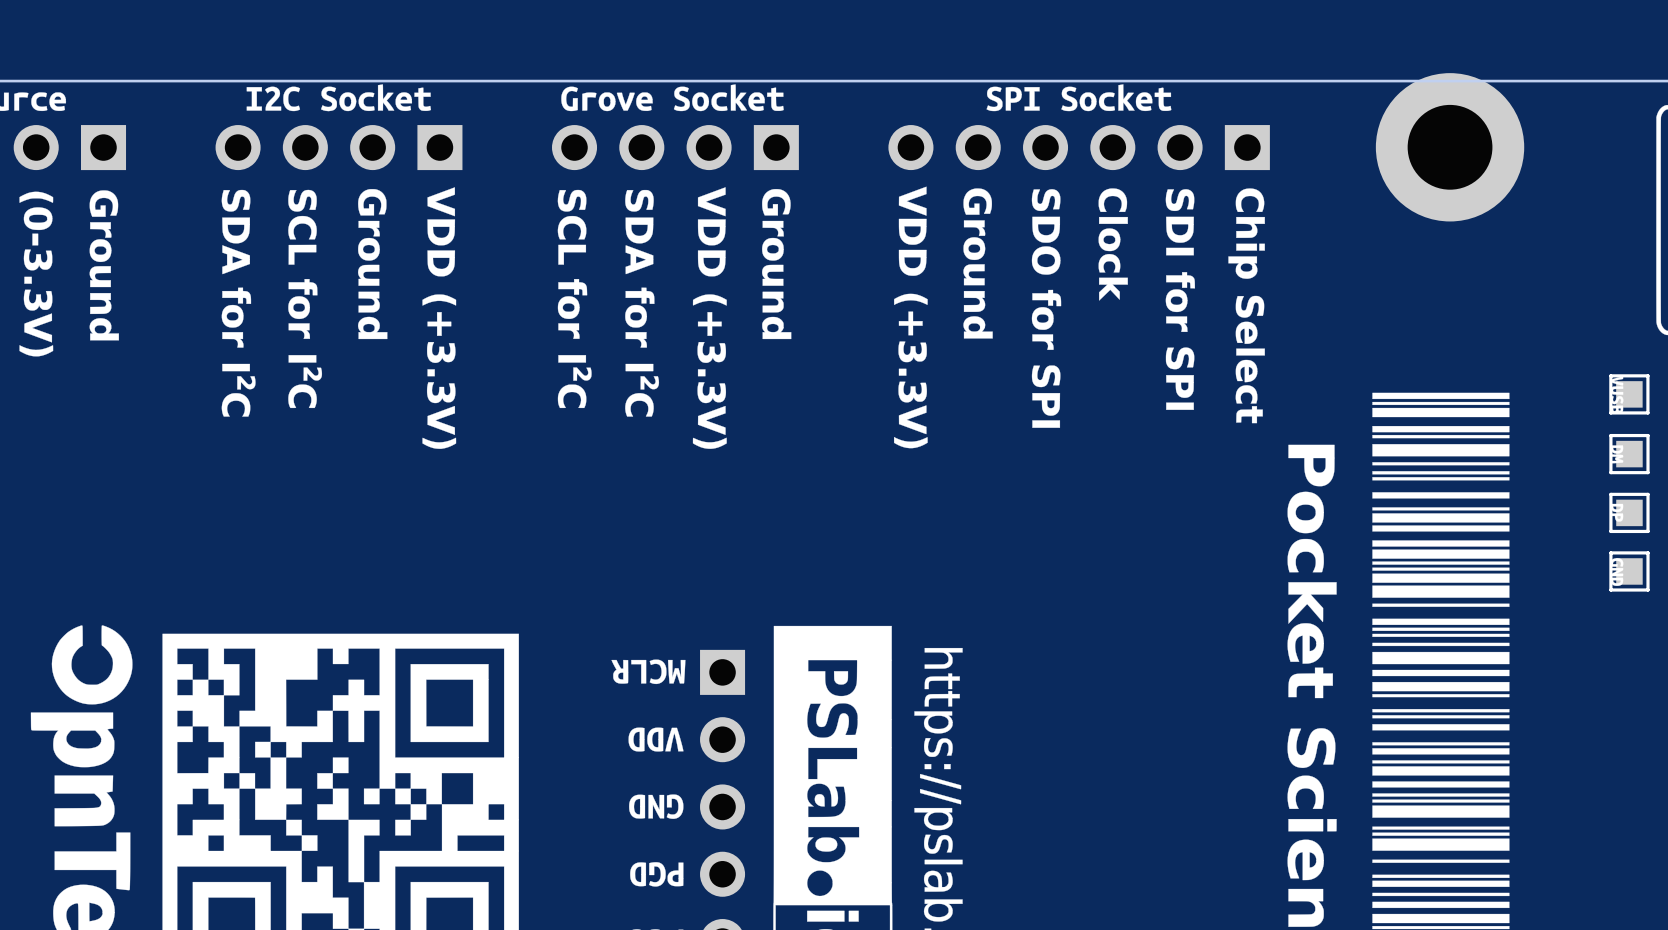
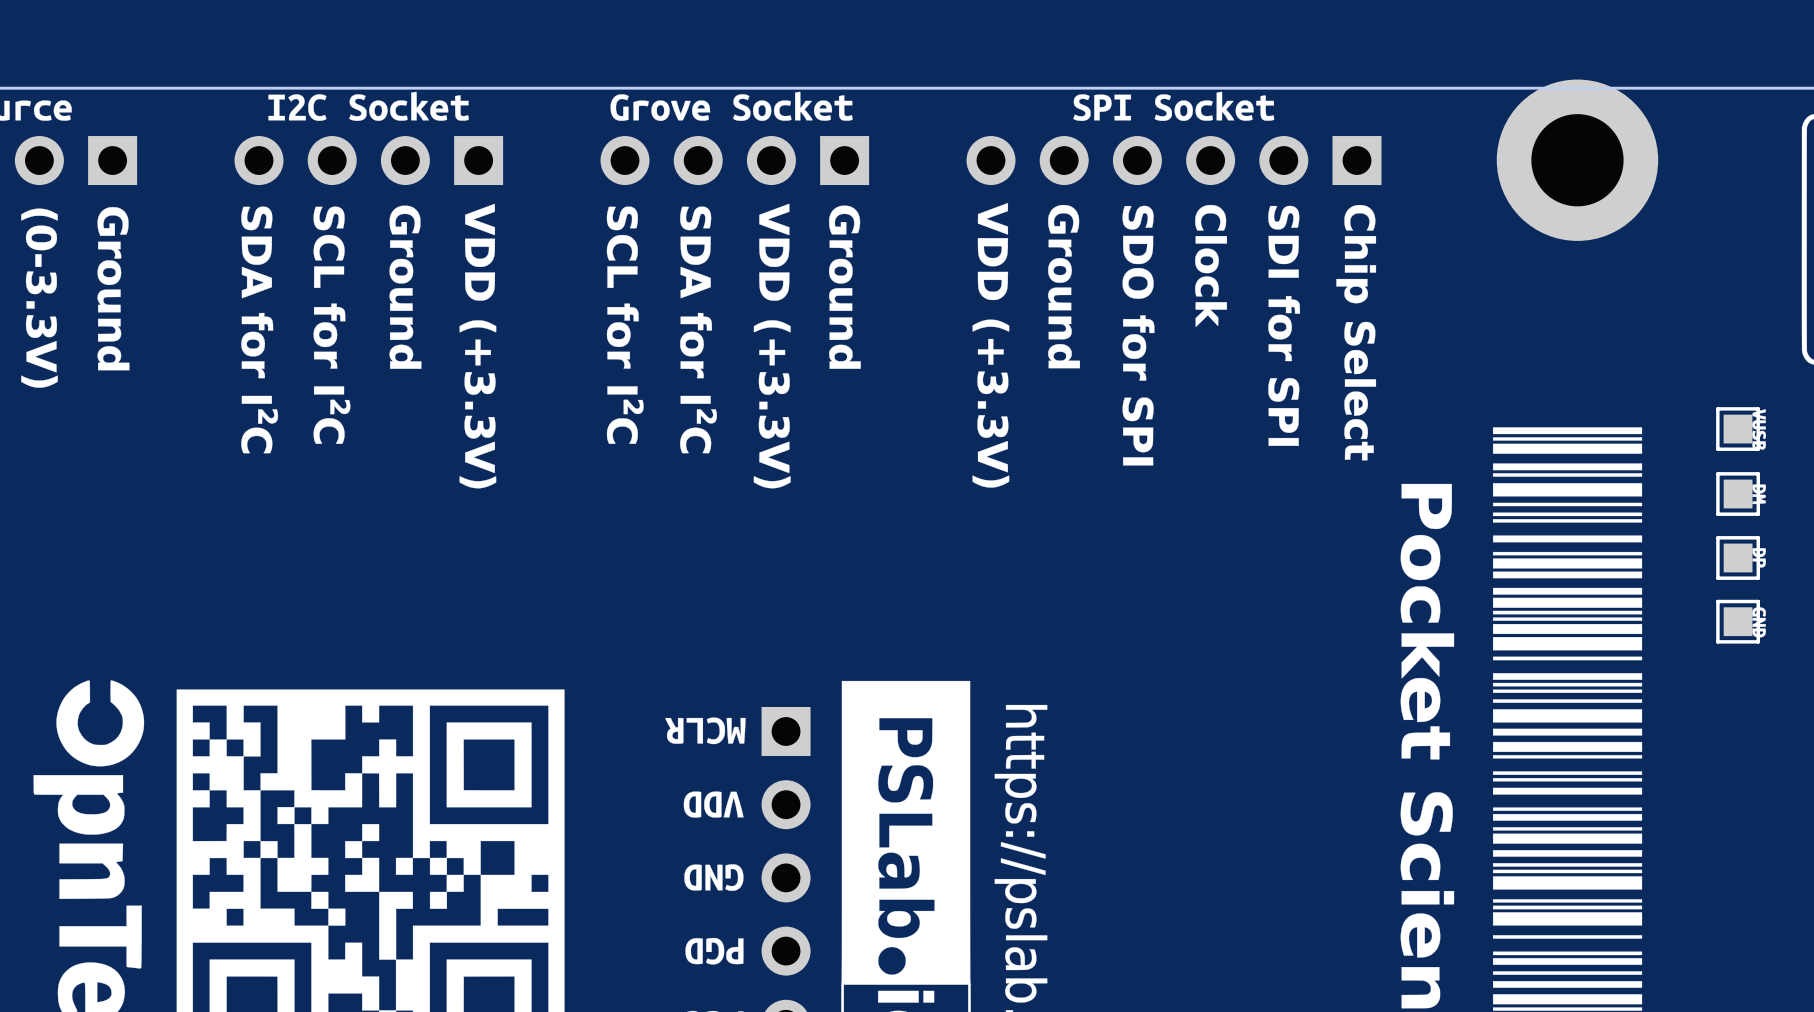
part position: (1629, 394) -> (1738, 429)
part position: (1629, 454) -> (1738, 494)
part position: (1629, 512) -> (1738, 557)
part position: (1629, 571) -> (1738, 621)

